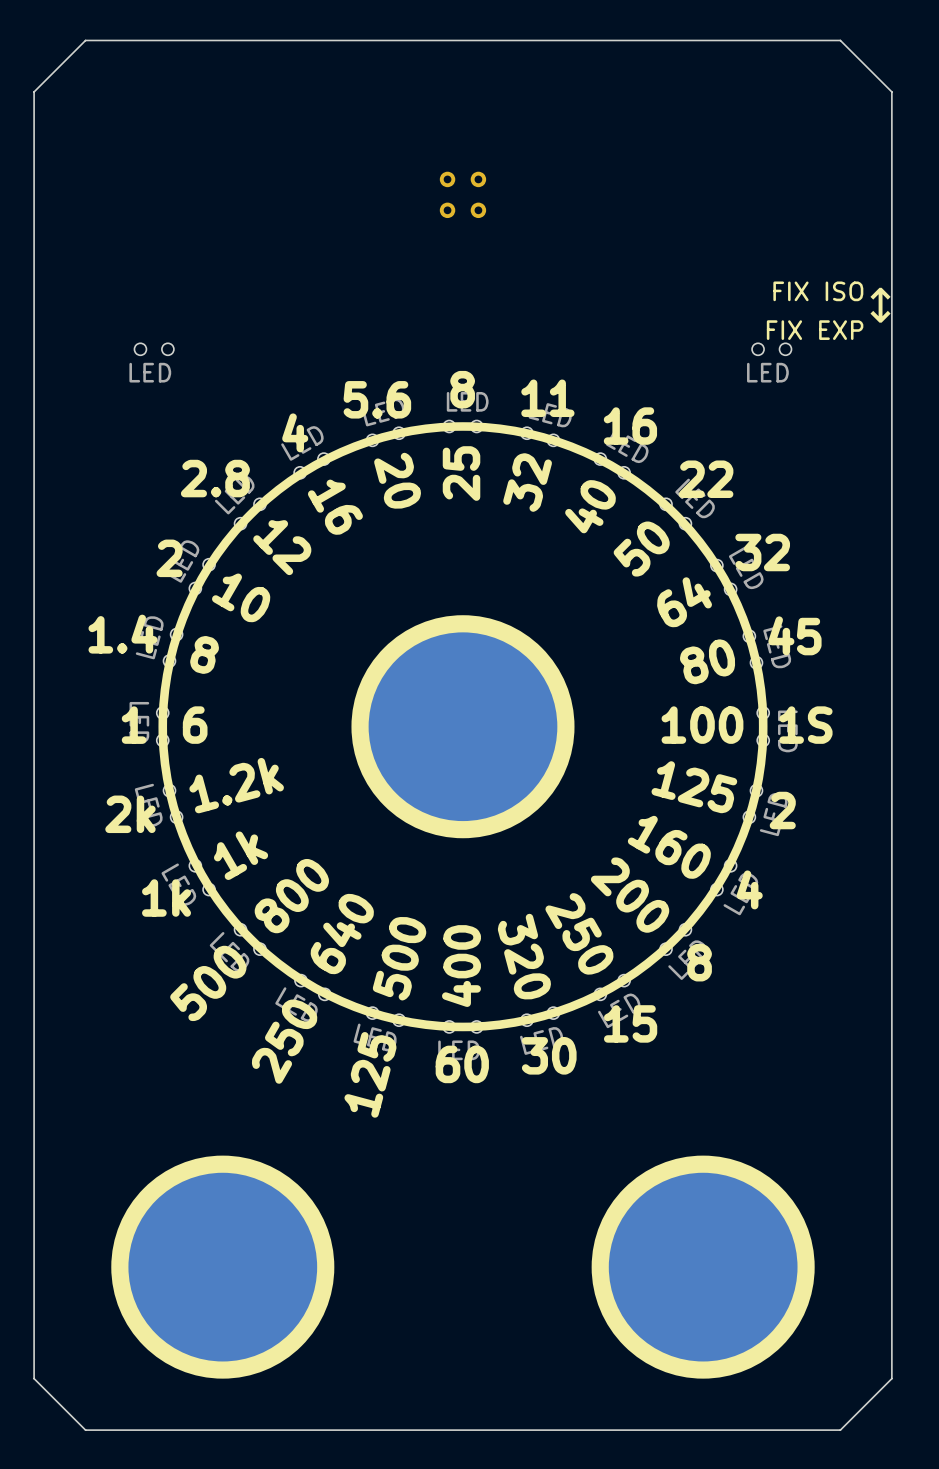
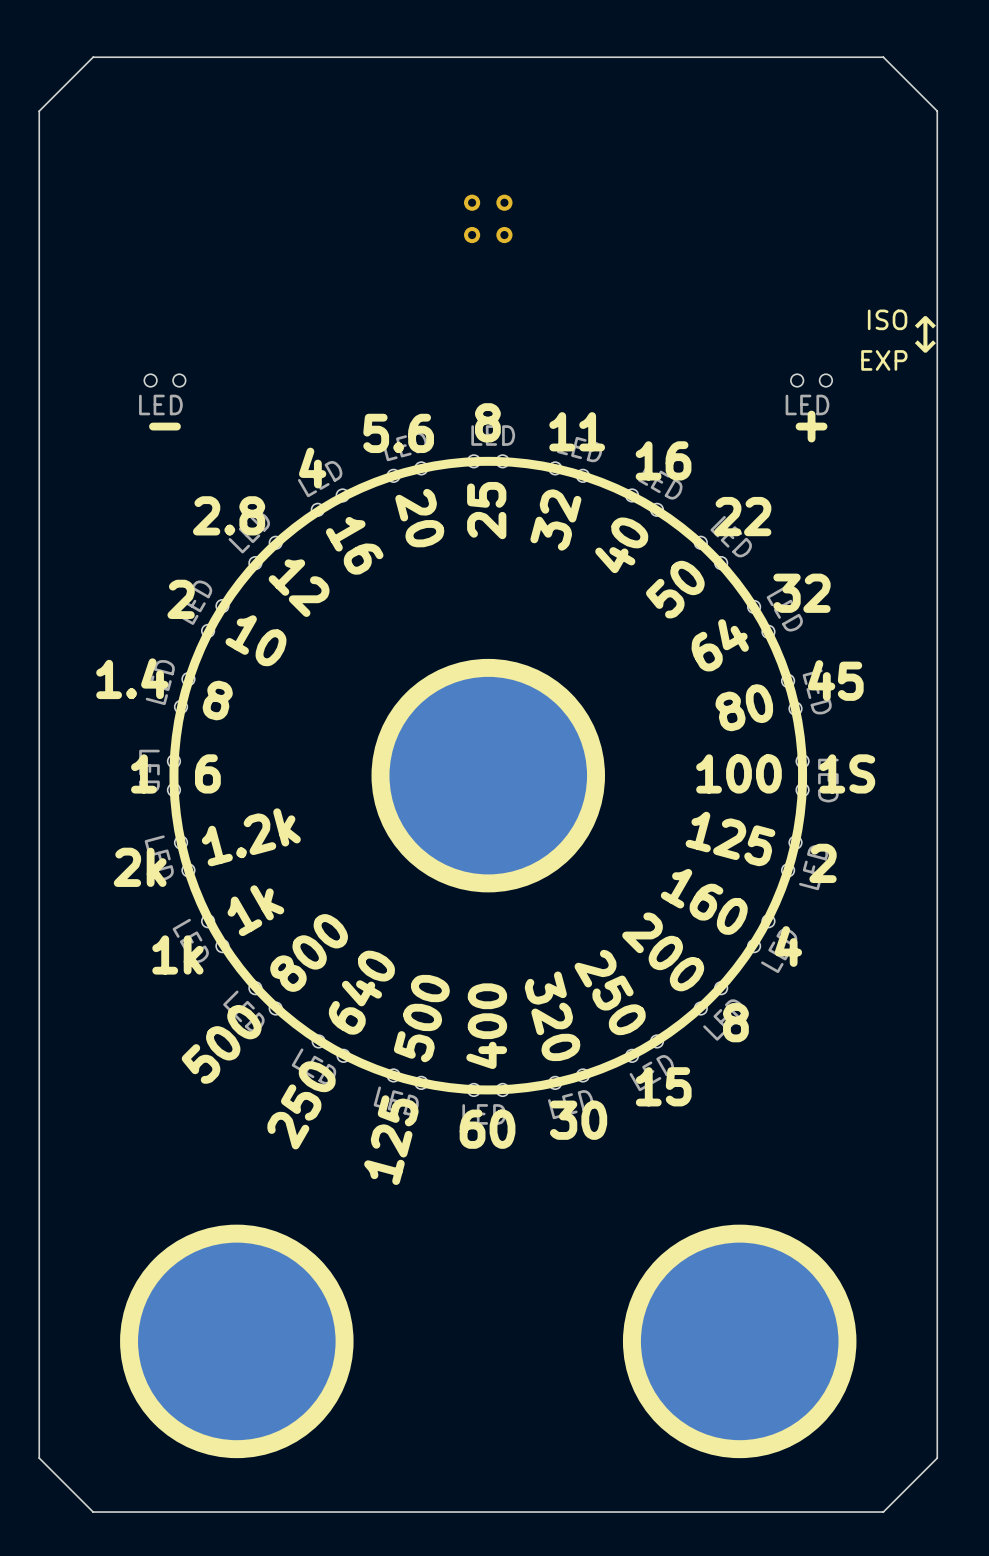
text: FIX ISO (818, 291) -> none
text: FIX EXP (815, 330) -> none
text: none -> - (164, 426)
text: none -> + (811, 426)

